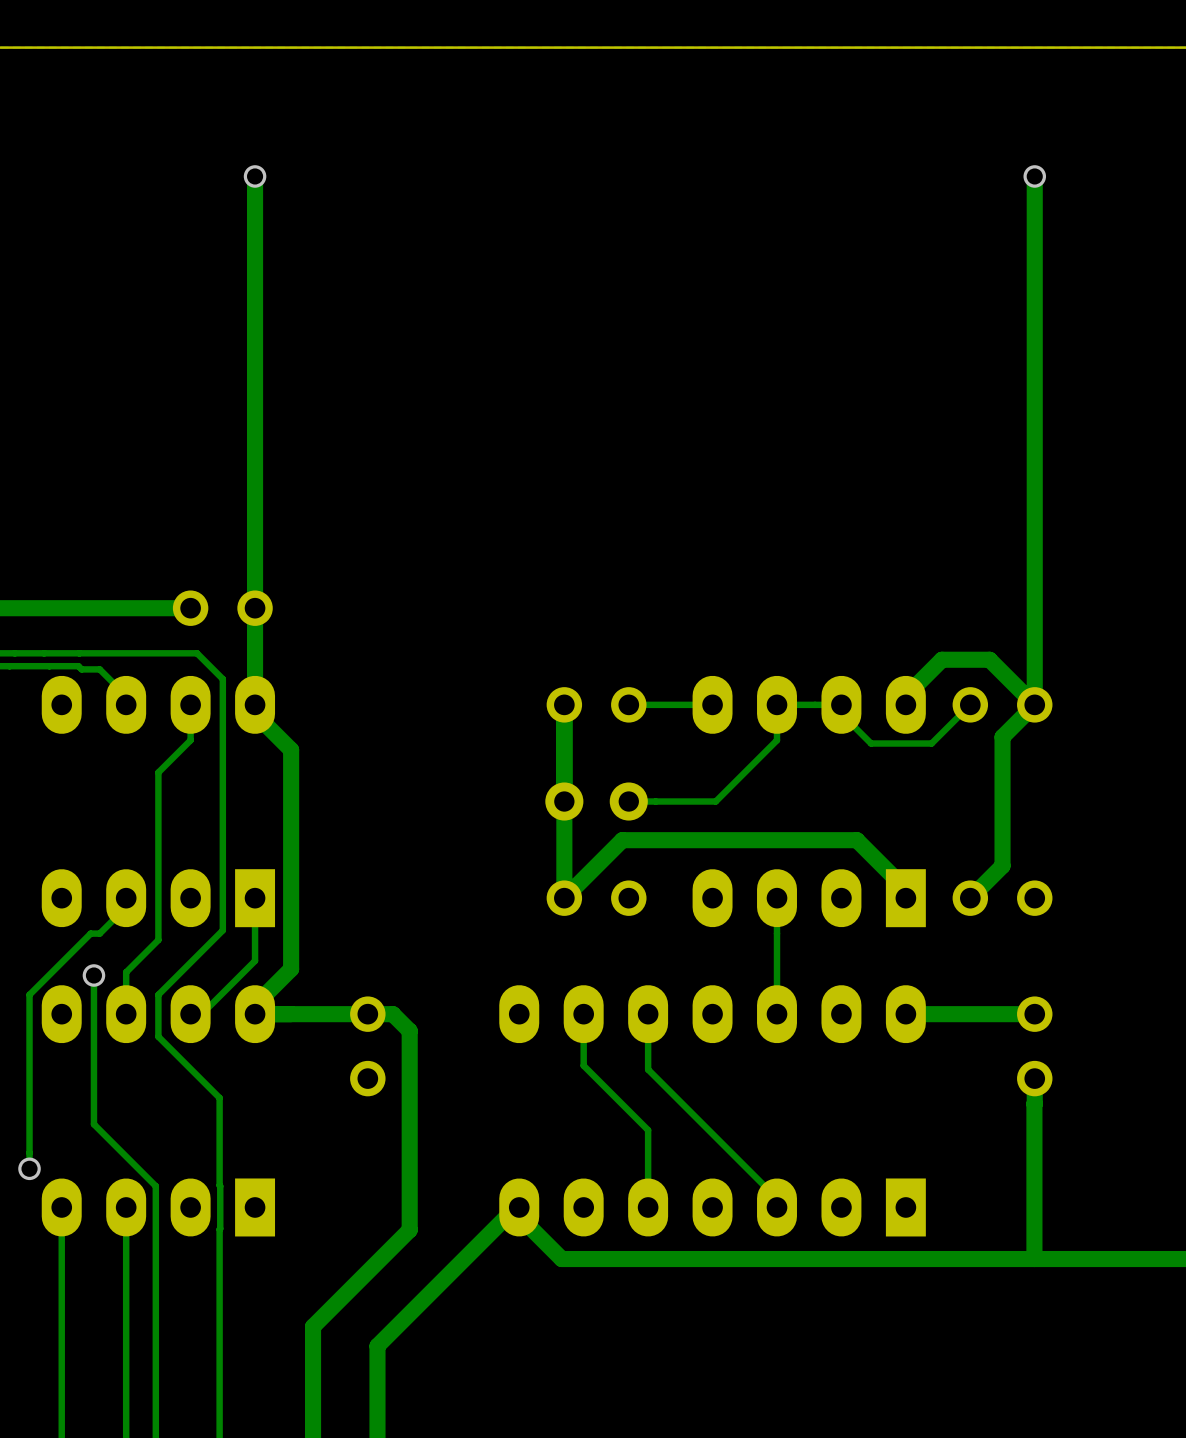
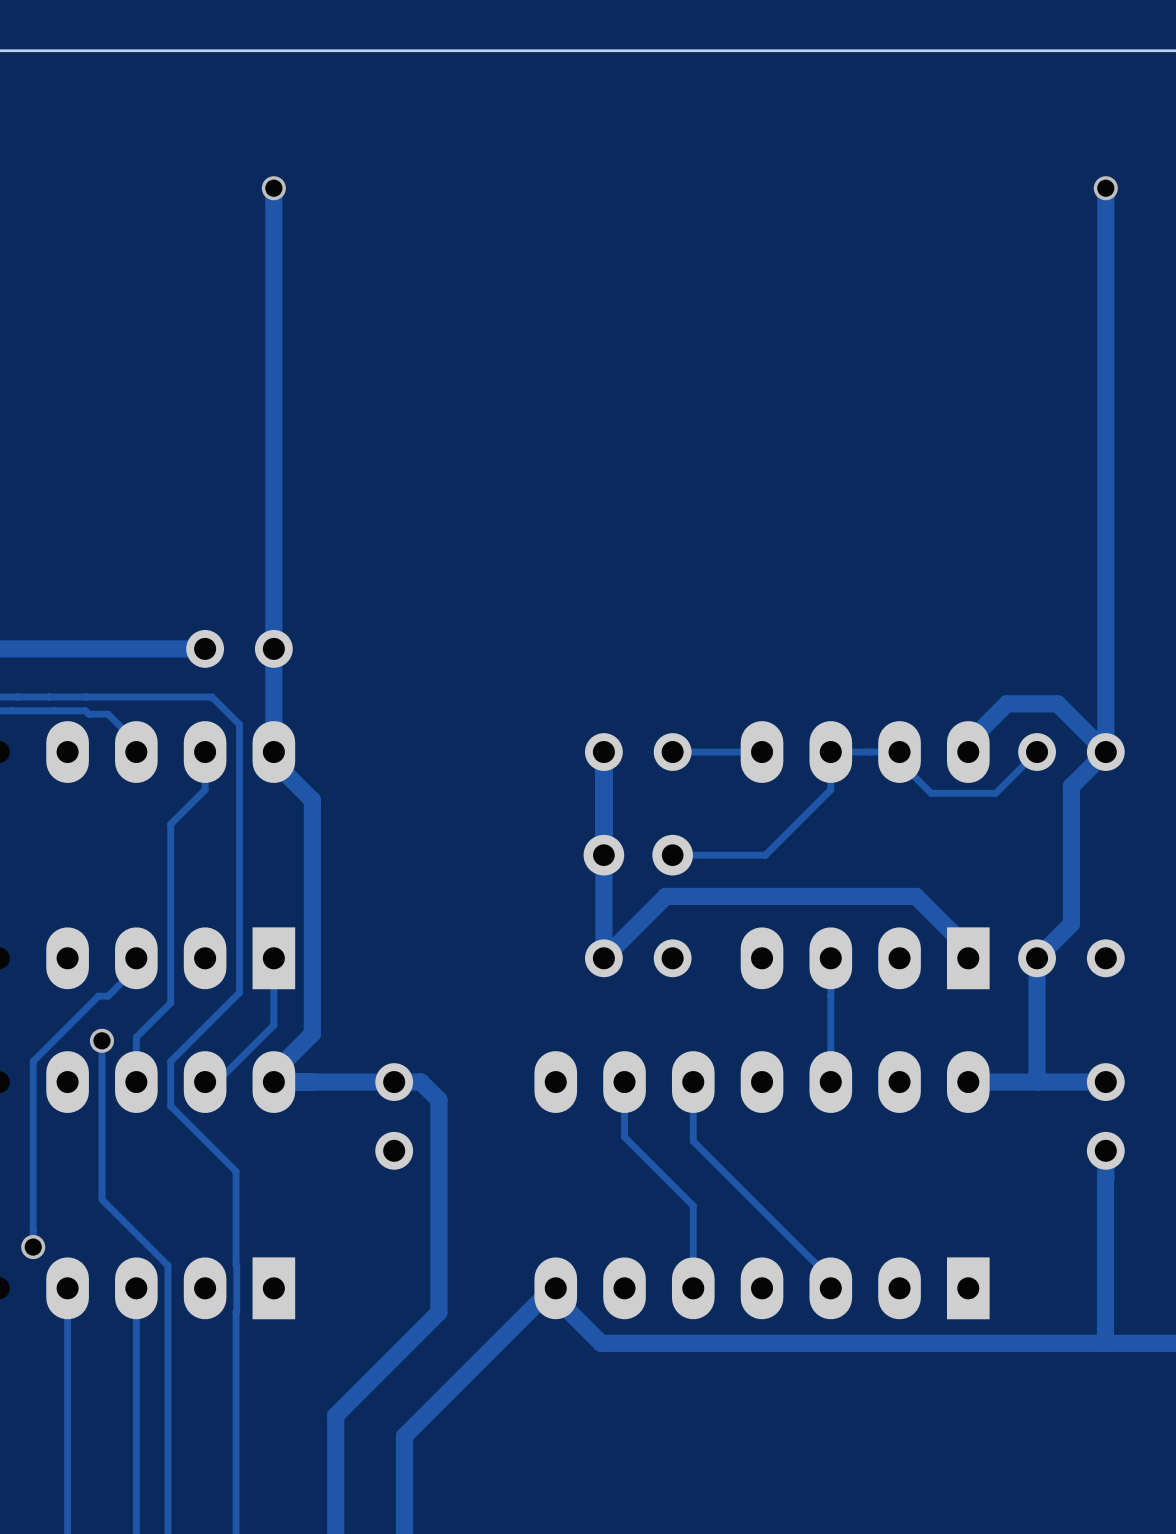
track: none -> (1037, 958) (1037, 1081)

